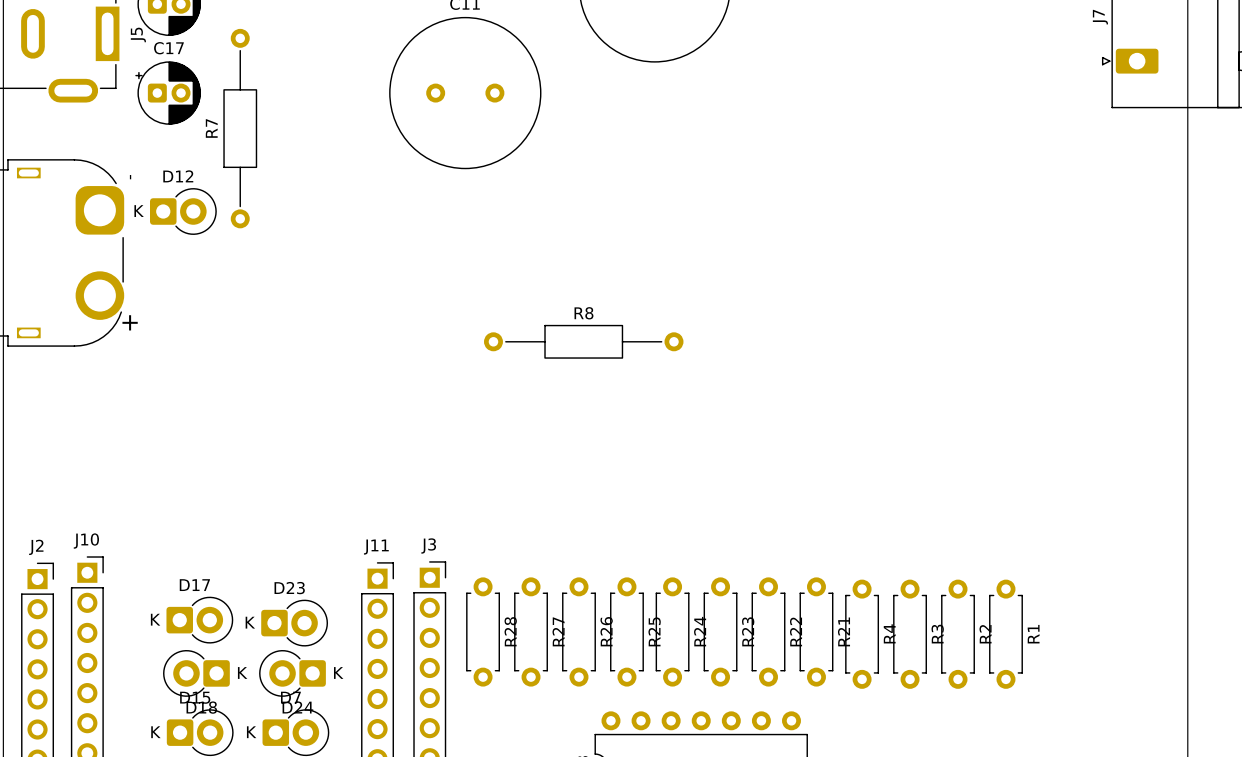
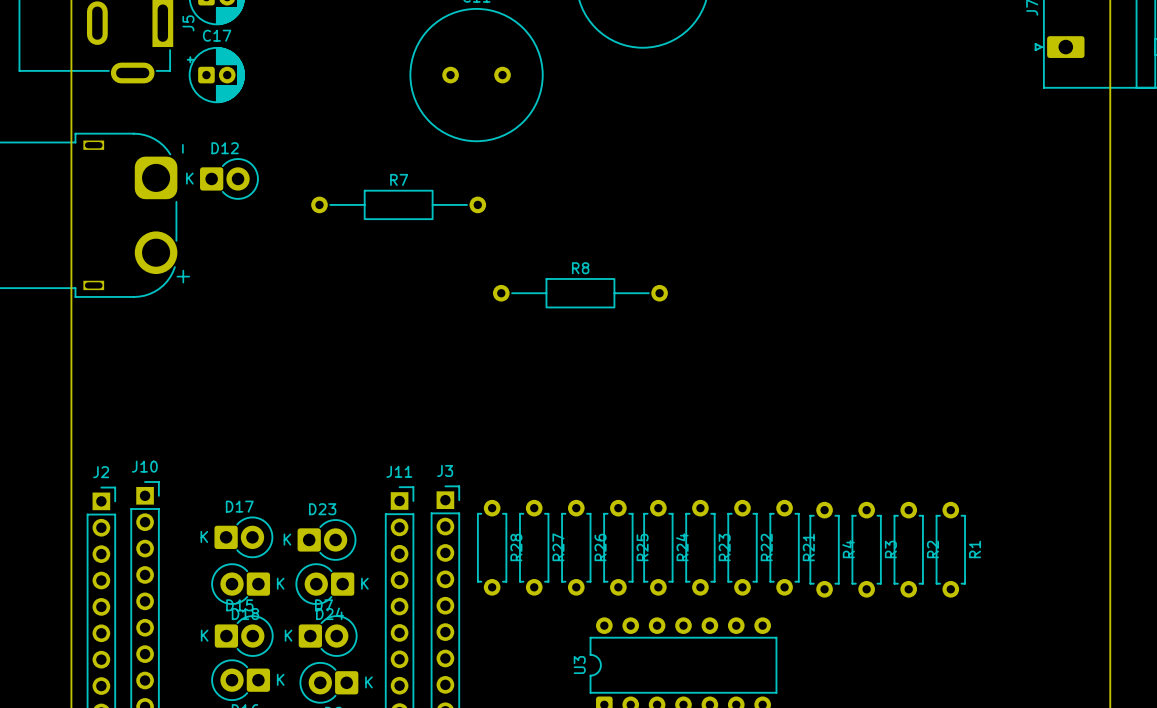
R7 rotation: 0° (240, 128) -> 90° clockwise (398, 204)
R7 position: (240, 128) -> (398, 204)

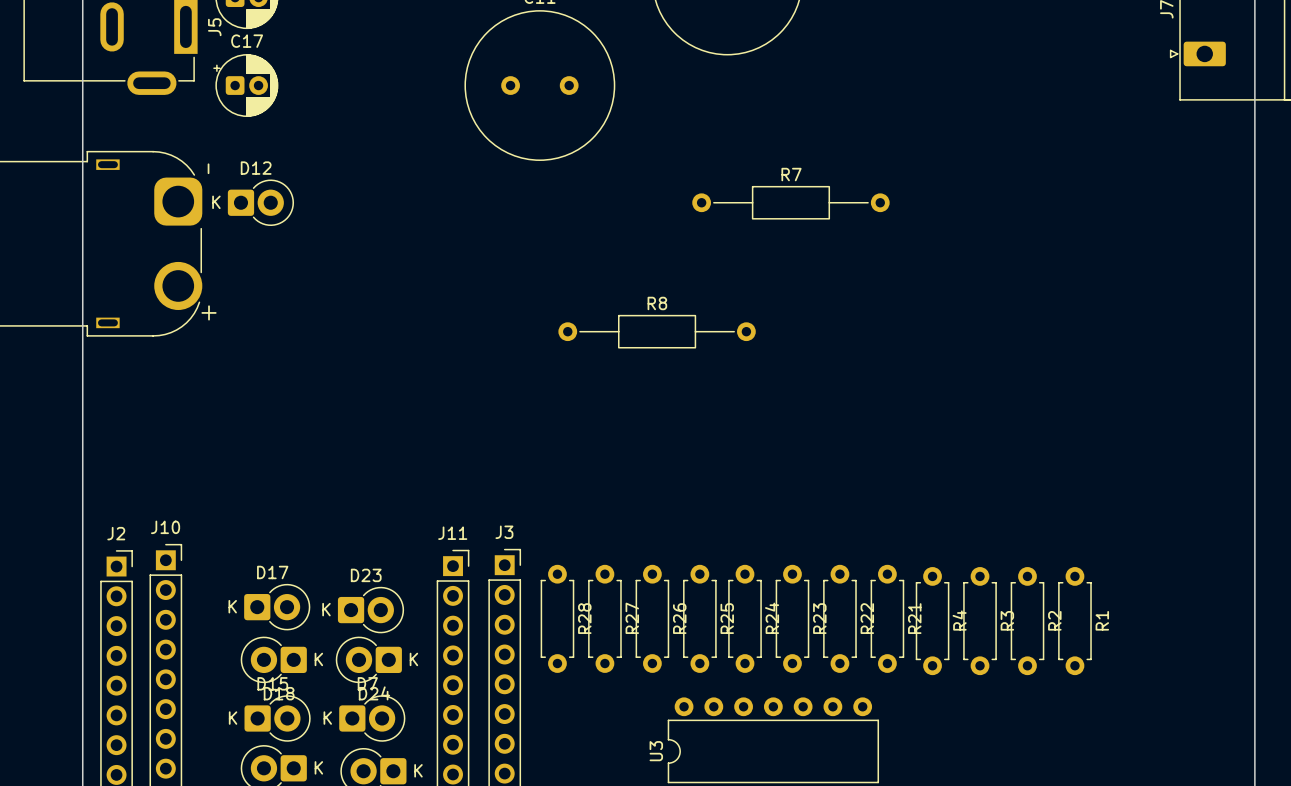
R7 position: (398, 204) -> (790, 202)

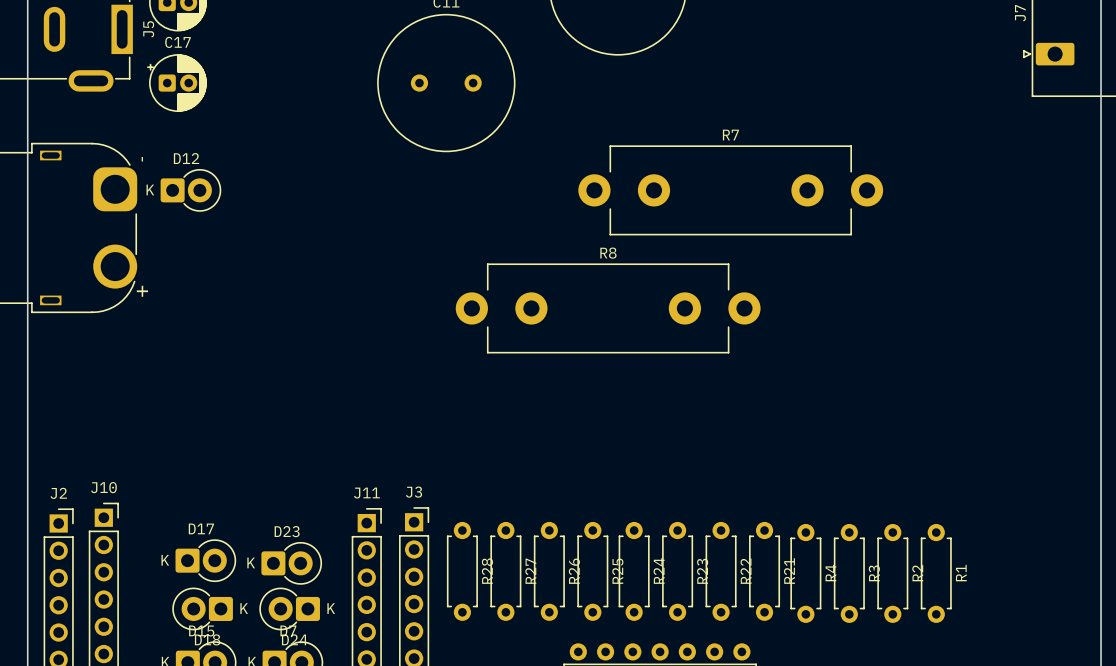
R7 name position: R7 (791, 174) -> R7 (730, 135)
R7 footprint: [692, 185, 890, 220] -> [578, 145, 884, 236]
R8 name position: R8 (657, 303) -> R8 (608, 253)
R8 footprint: [558, 314, 756, 349] -> [455, 263, 761, 354]

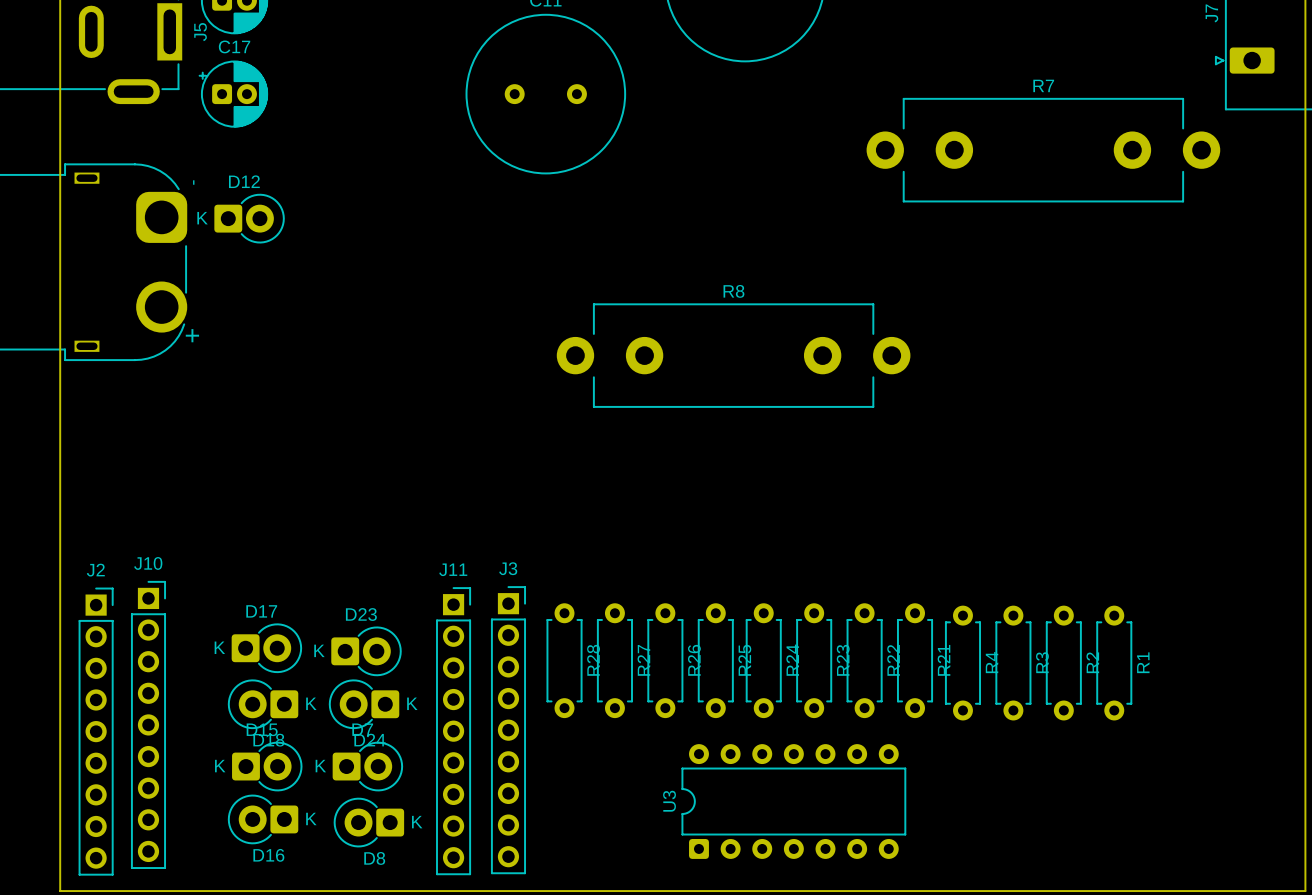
R7 position: (730, 190) -> (1043, 150)

